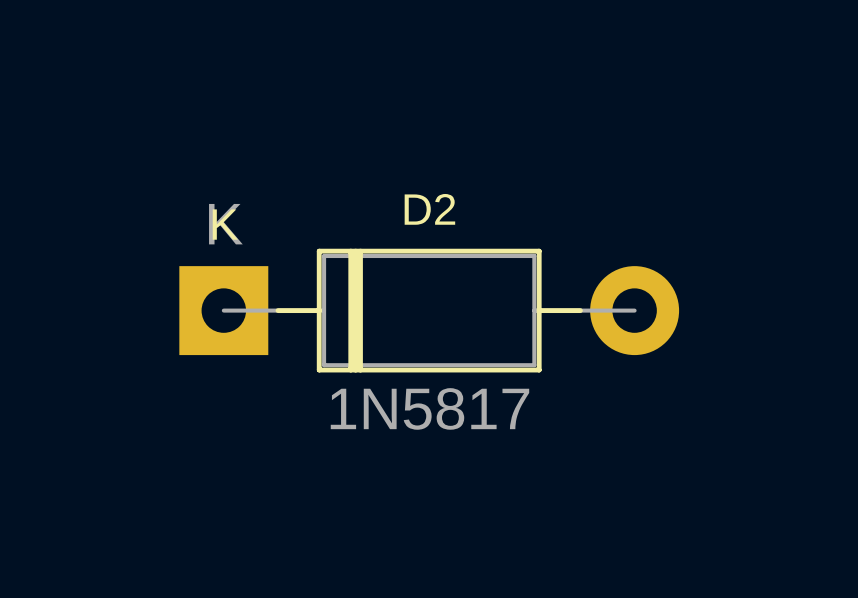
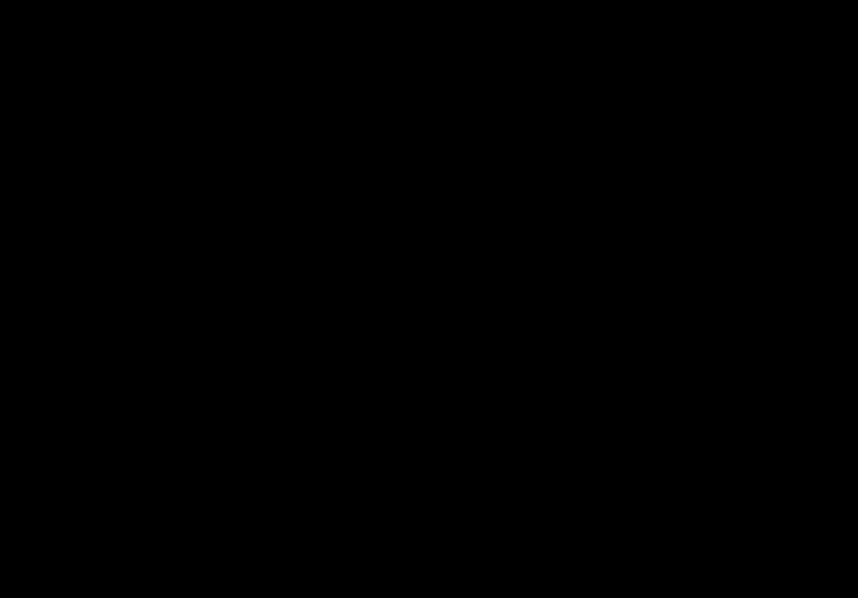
D2: 1N5817 (429, 310) -> none

